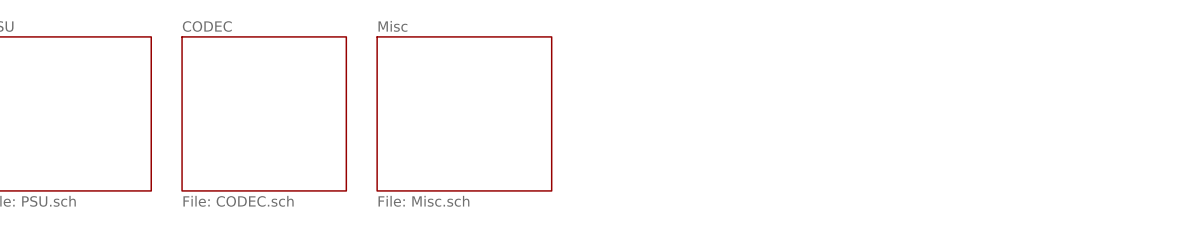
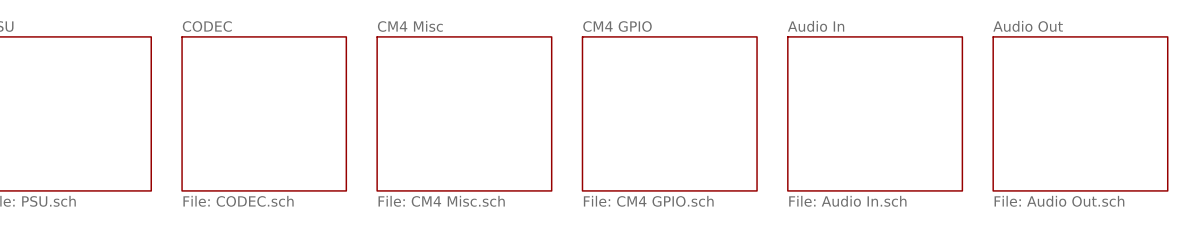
sheet Misc name: Misc (392, 26) -> CM4 Misc (410, 26)
sheet CM4 GPIO: none -> File: CM4 GPIO.sch (669, 113)
sheet Audio In: none -> File: Audio In.sch (875, 113)
sheet Audio Out: none -> File: Audio Out.sch (1080, 113)
sheet Misc value: File: Misc.sch (423, 201) -> File: CM4 Misc.sch (441, 201)

